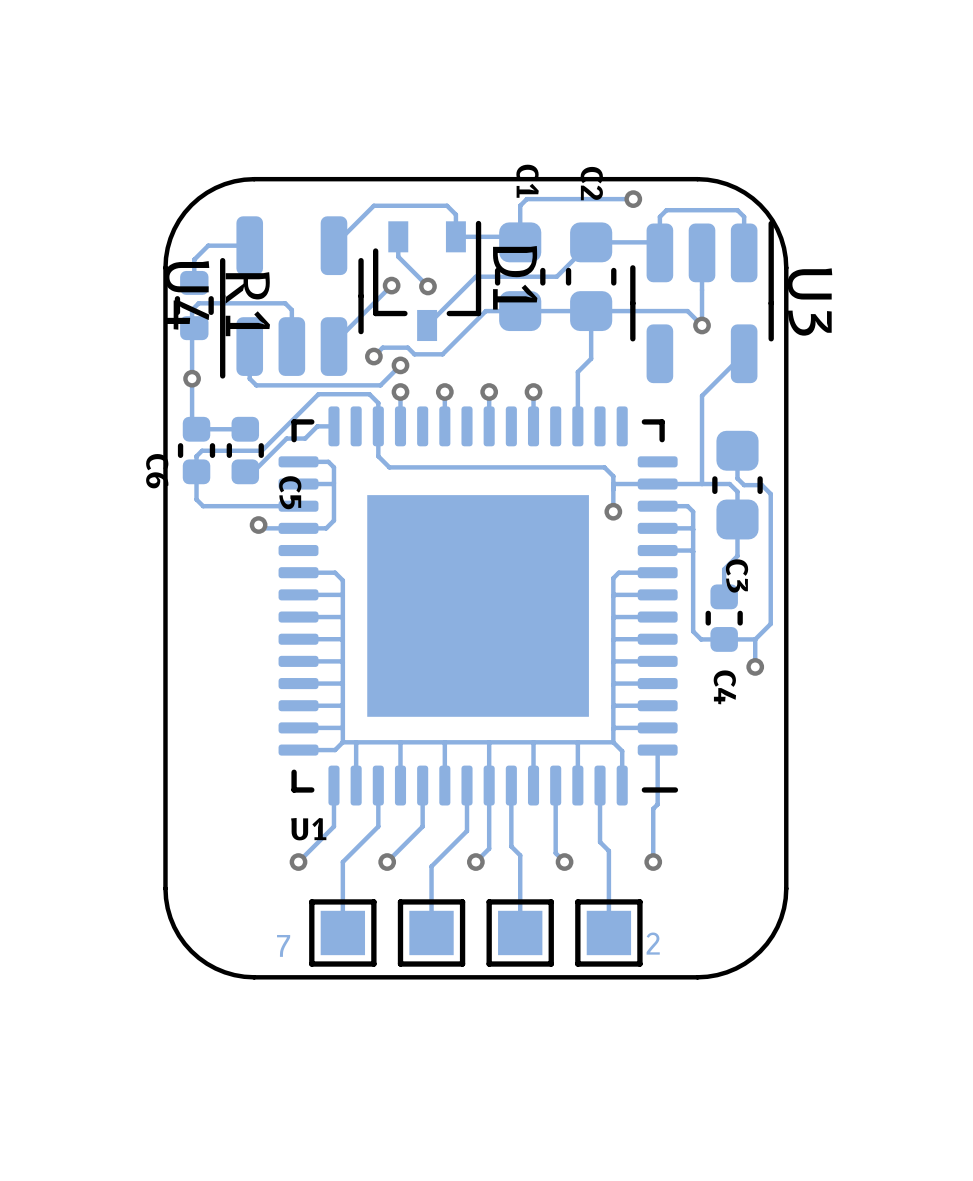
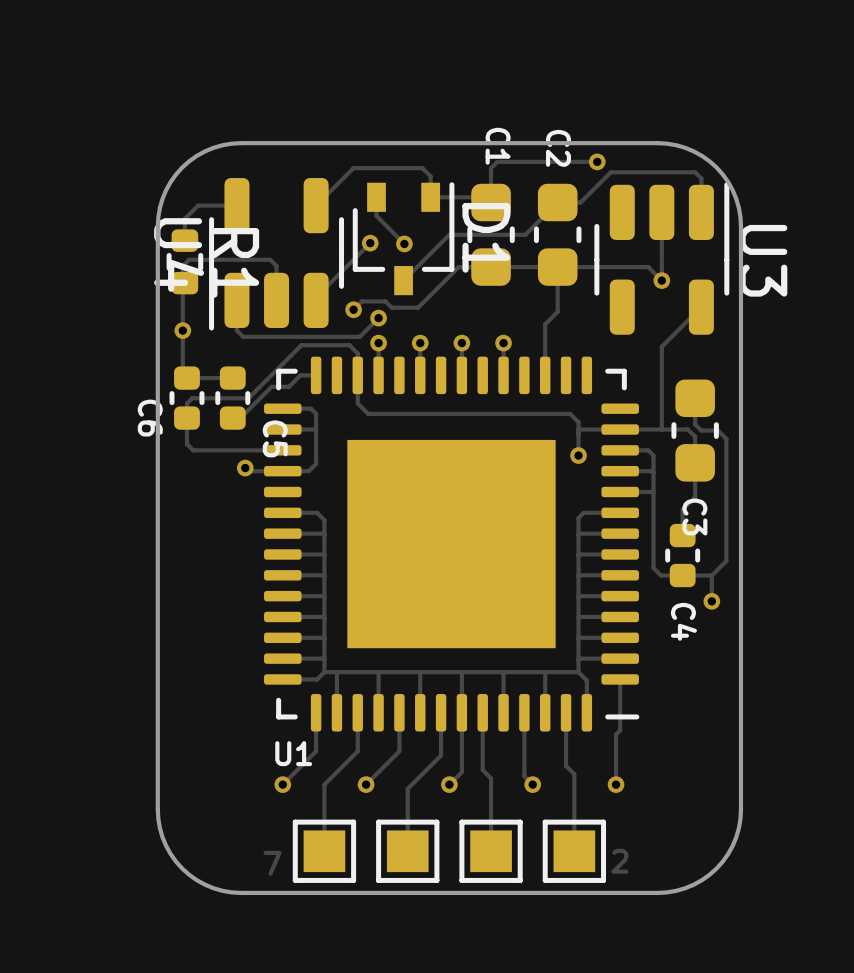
track: (666, 210) (659, 216) (659, 252) (649, 242) (615, 242) -> (628, 172) (610, 172) (580, 202)

